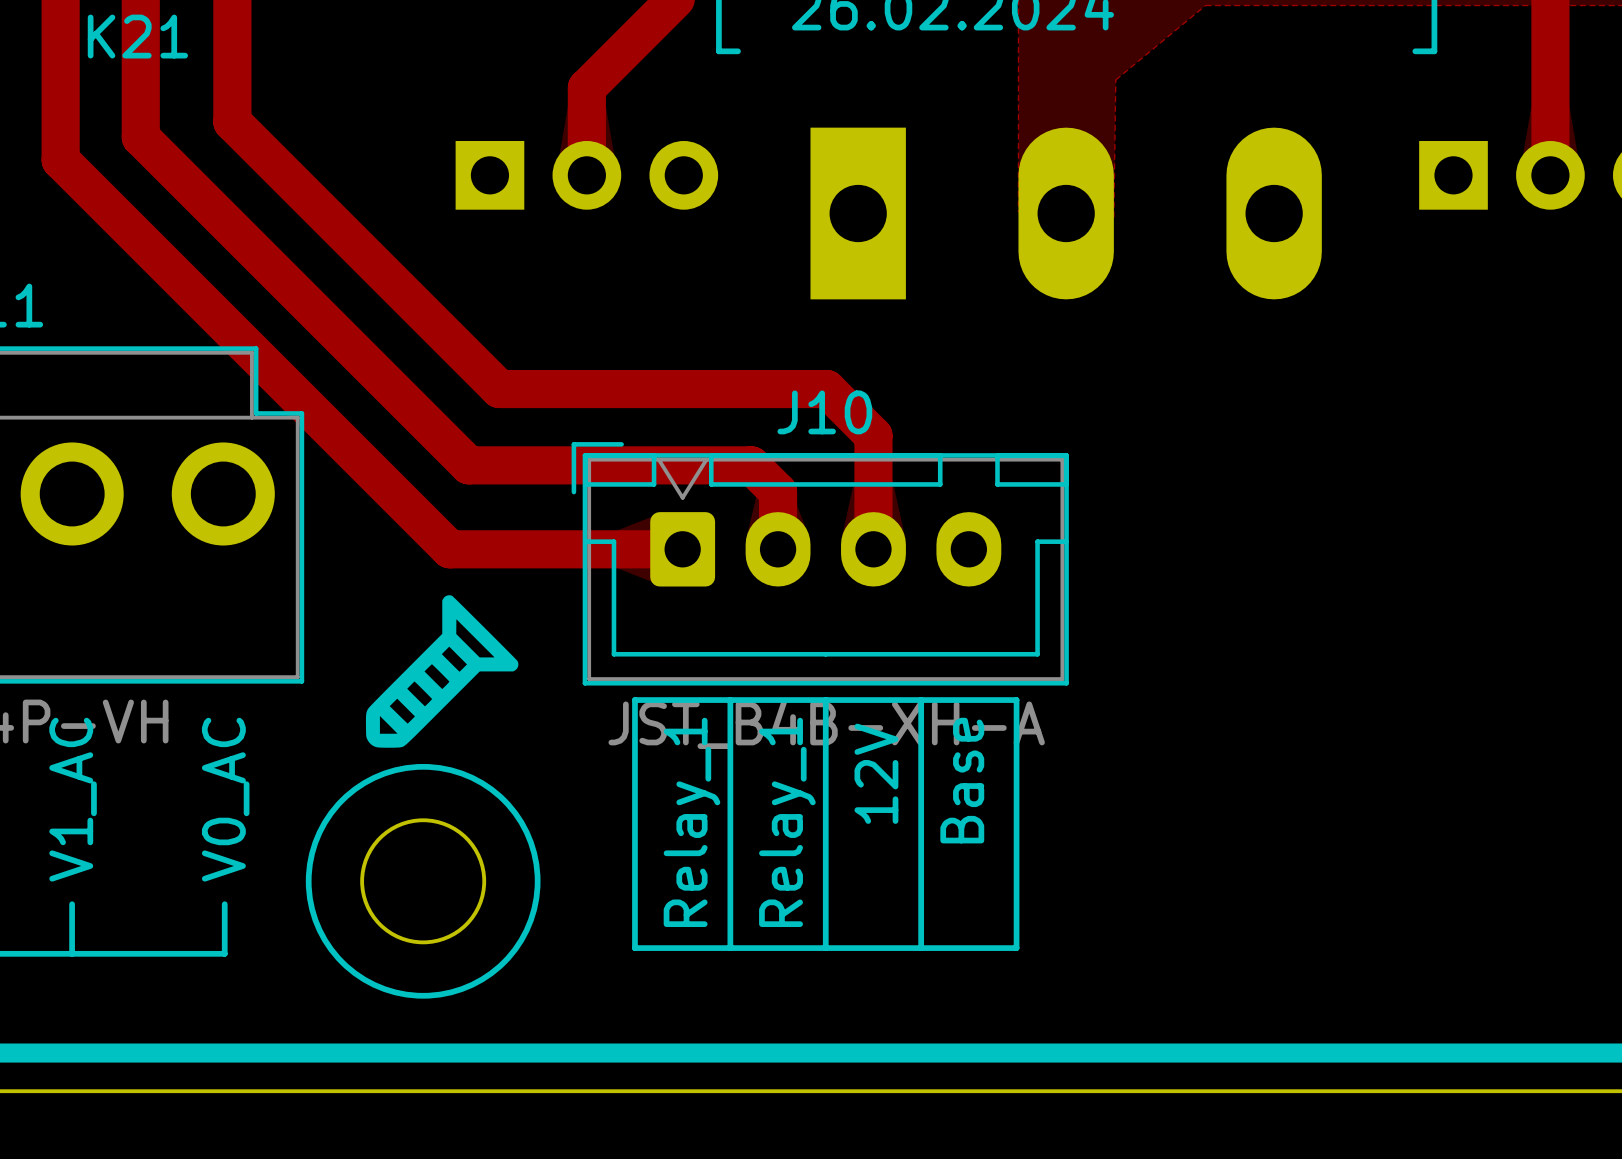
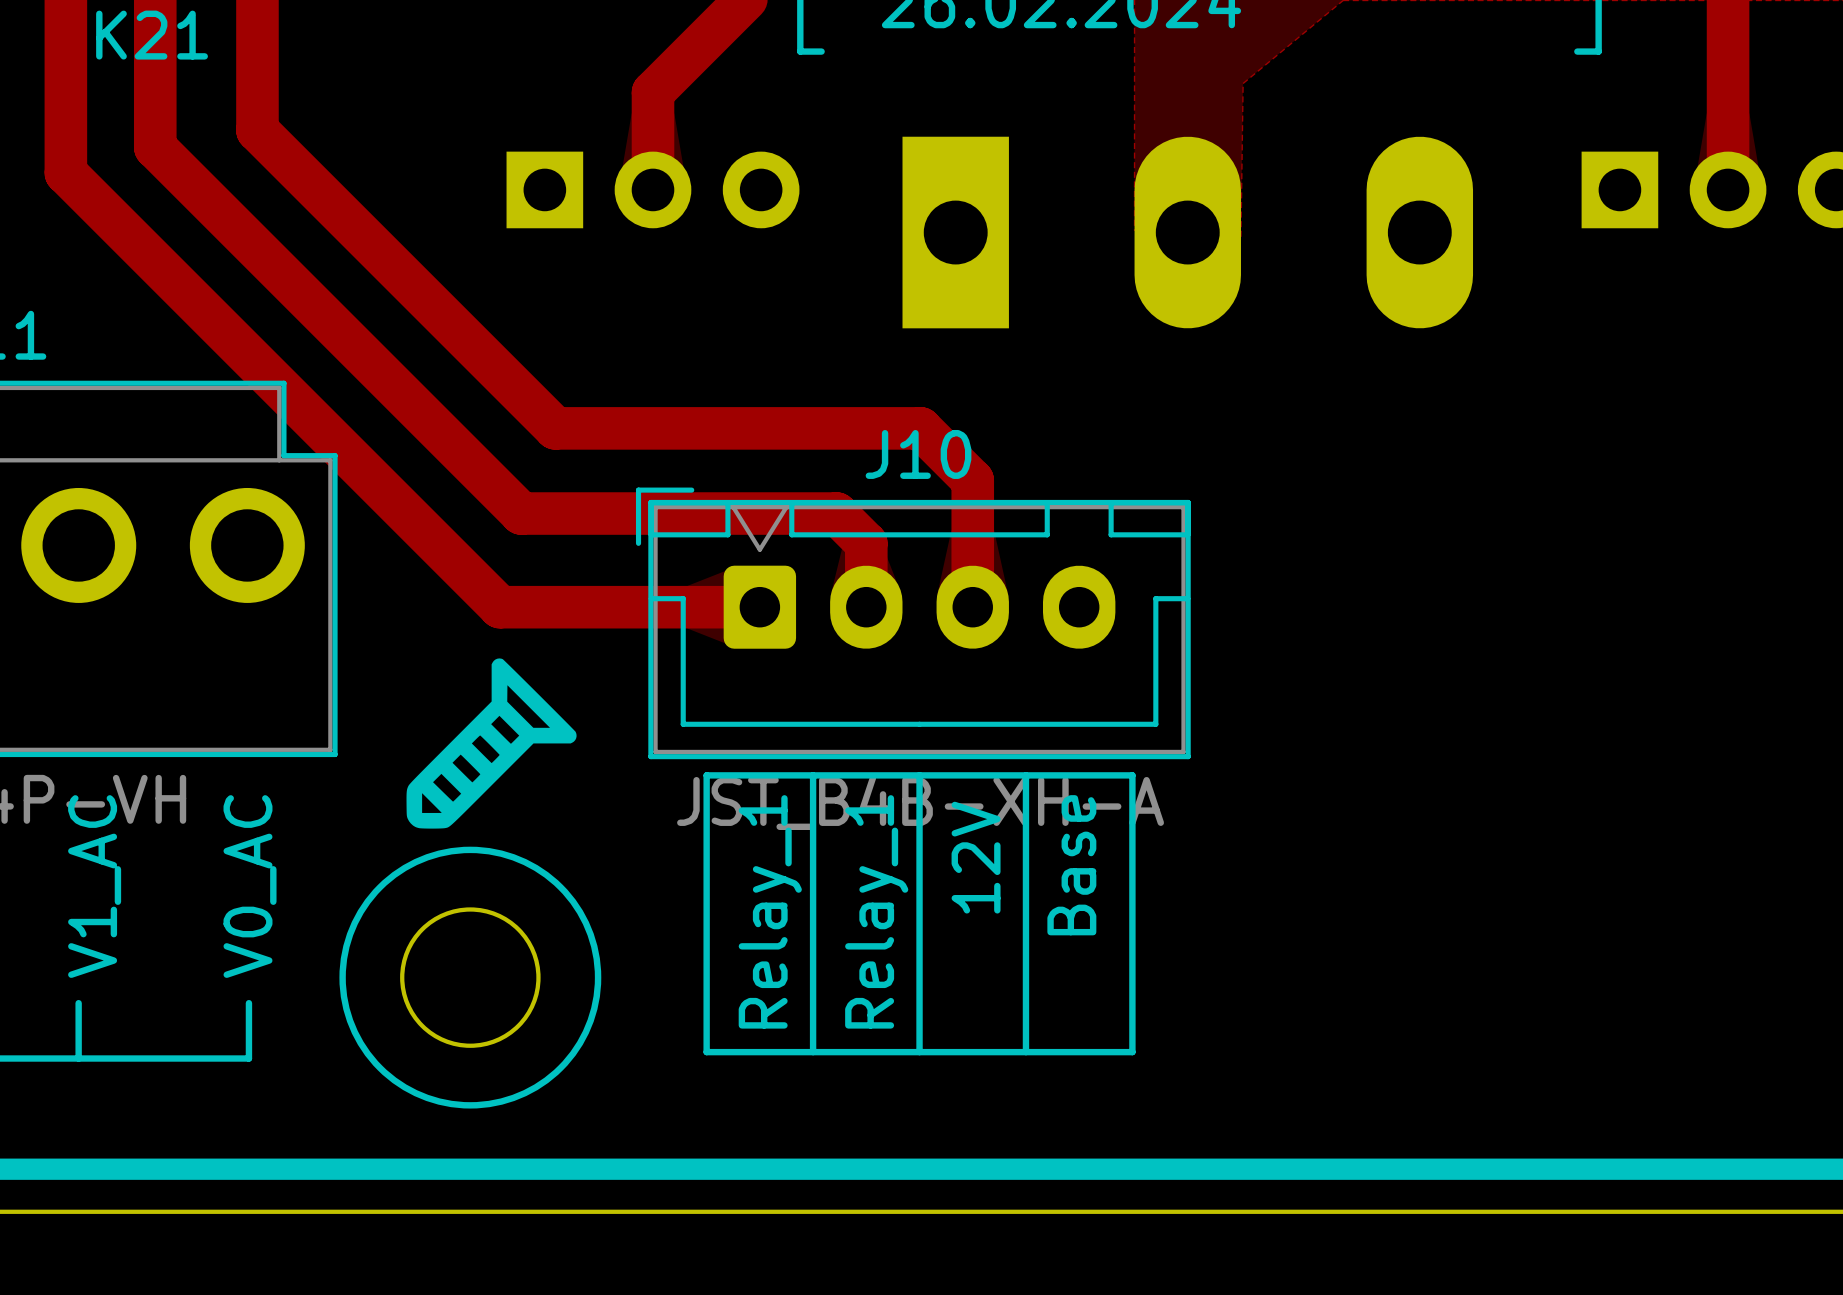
text position: V1_AC (73, 799) -> V1_AC (94, 886)

